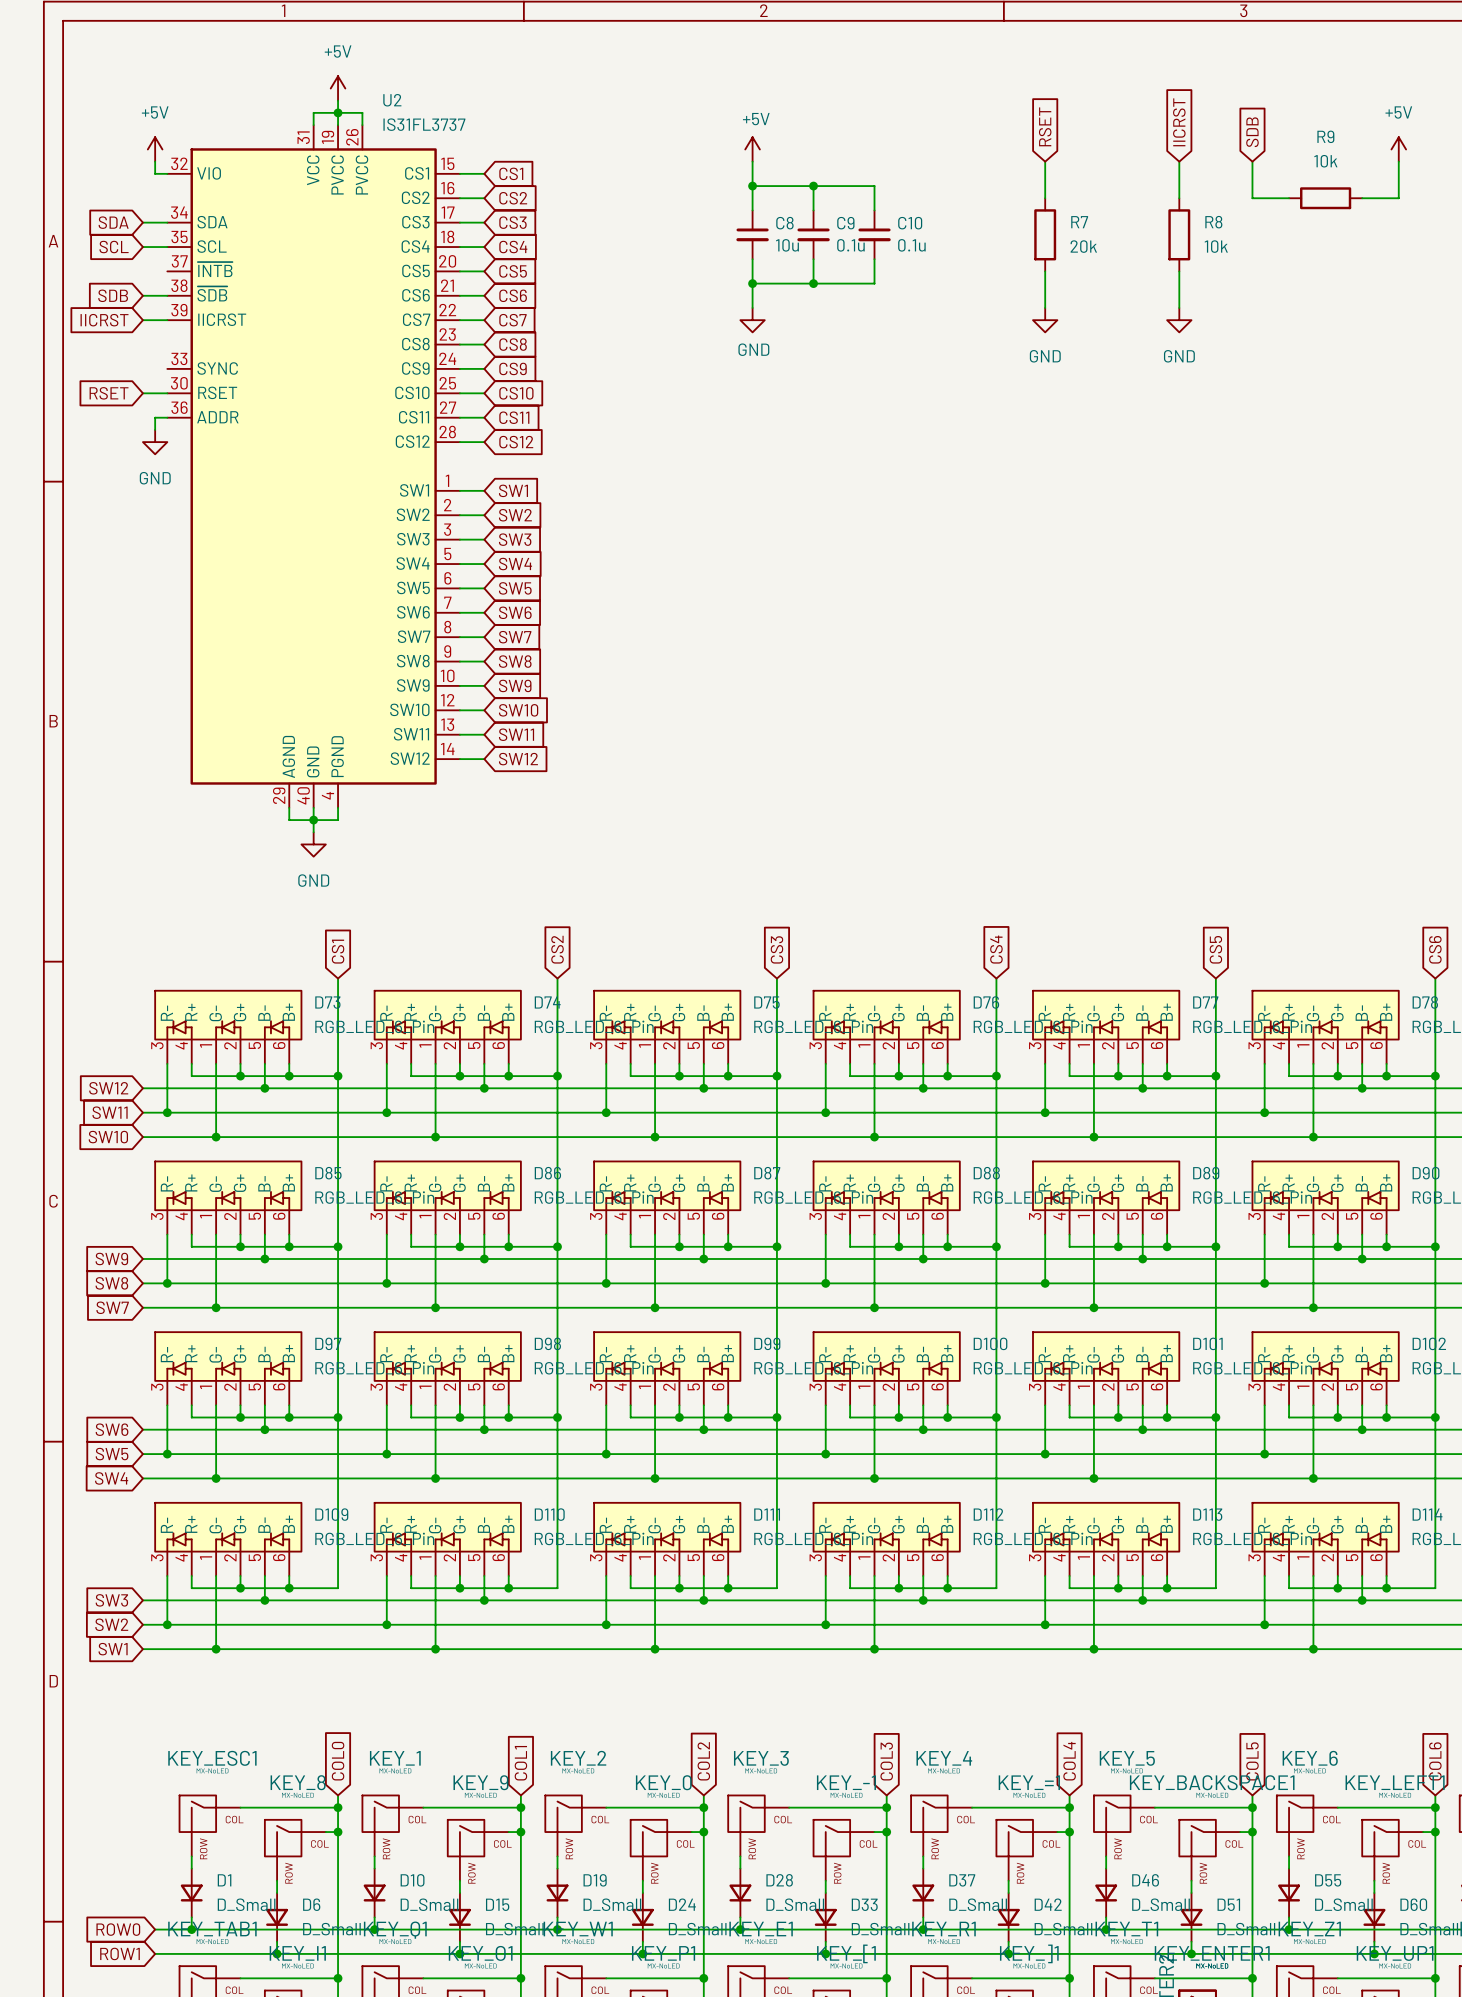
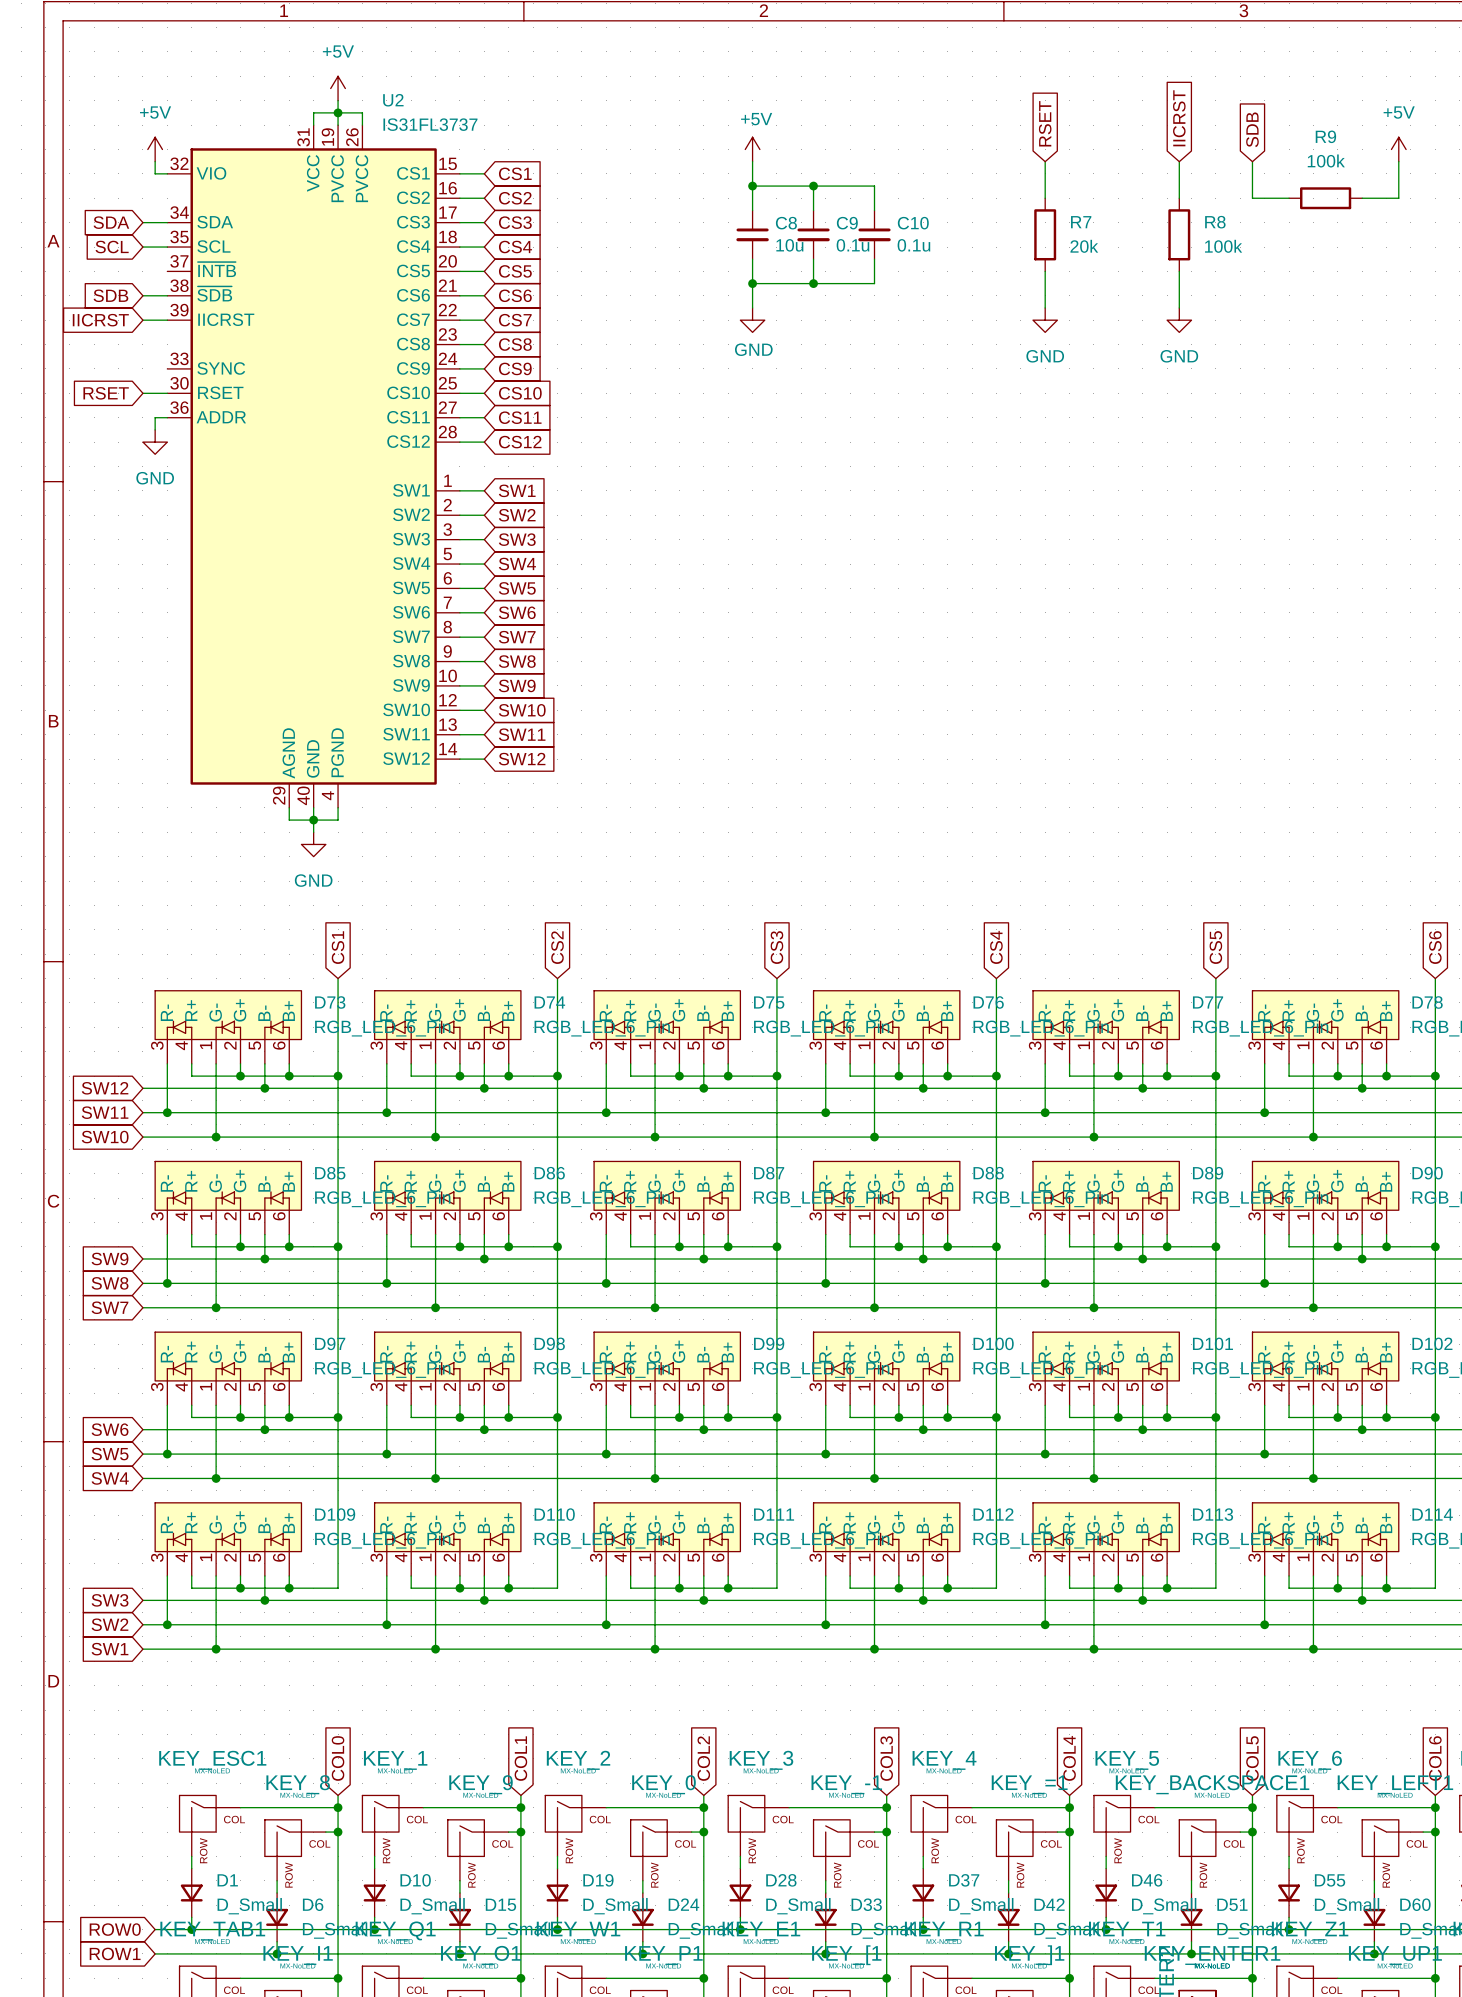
R9 value: 10k (1325, 161) -> 100k (1326, 160)
R8 value: 10k (1216, 246) -> 100k (1223, 246)

